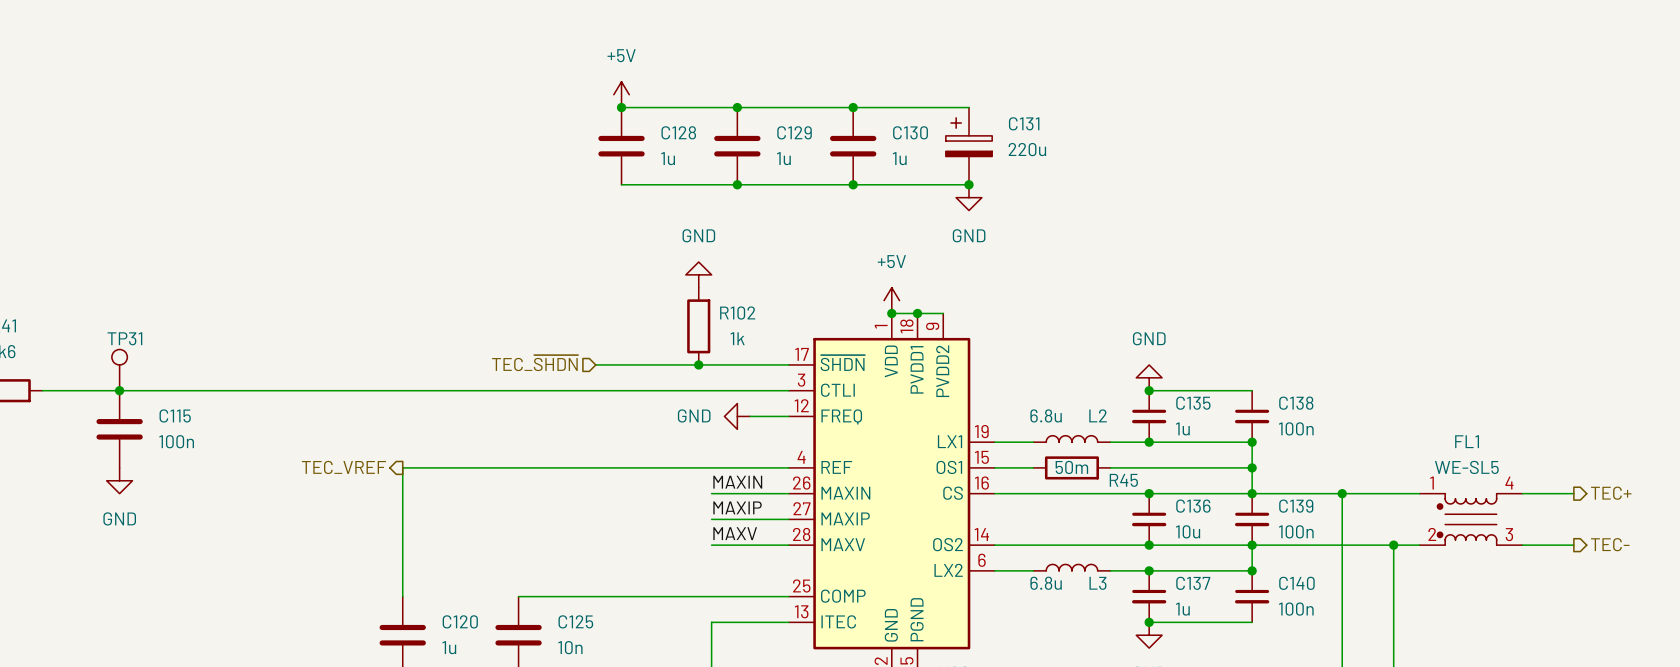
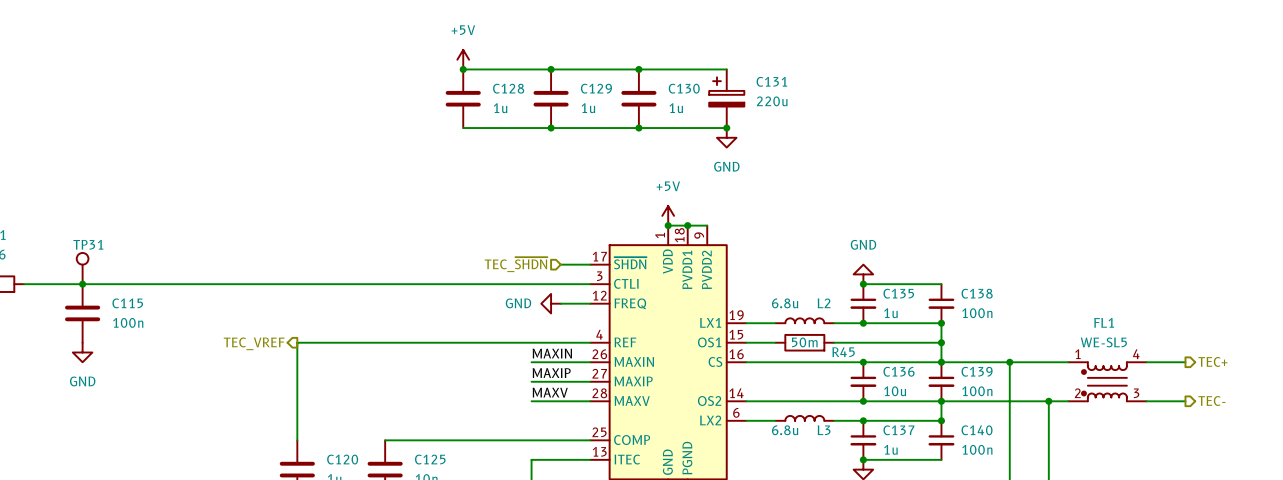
power symbol: GND (698, 274) -> none
R102: 1k (698, 326) -> none
hierarchical label position: TEC_~{SHDN} (535, 363) -> TEC_~{SHDN} (516, 264)
wire: (595, 364) (750, 364) -> none
junction: (698, 364) -> none

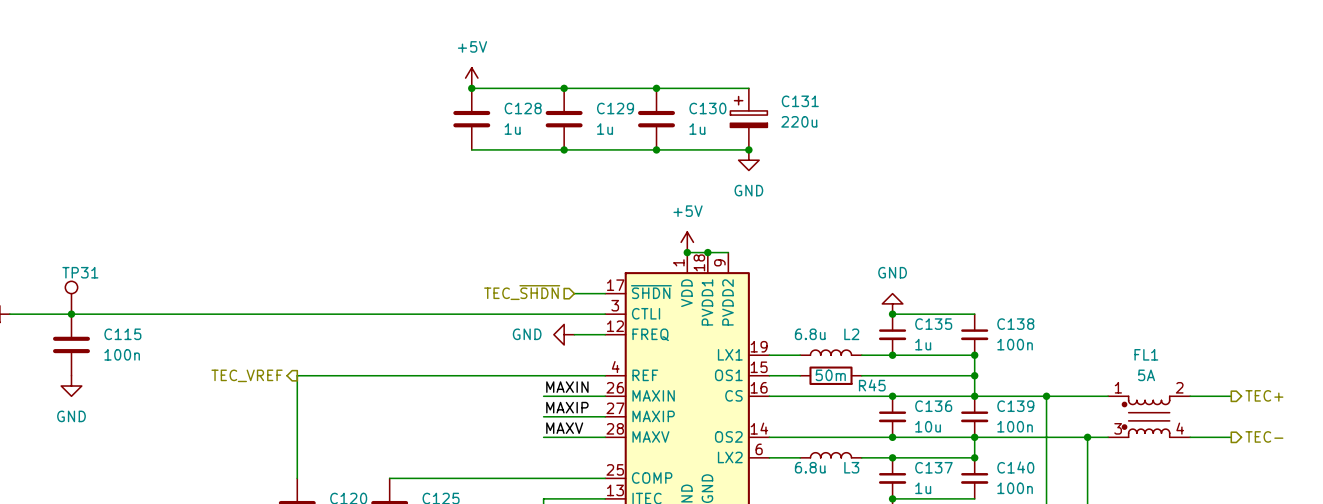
FL1 value: WE-SL5 (1103, 342) -> 5A (1146, 375)
FL1 symbol: [1068, 362, 1147, 402] -> [1108, 396, 1191, 438]

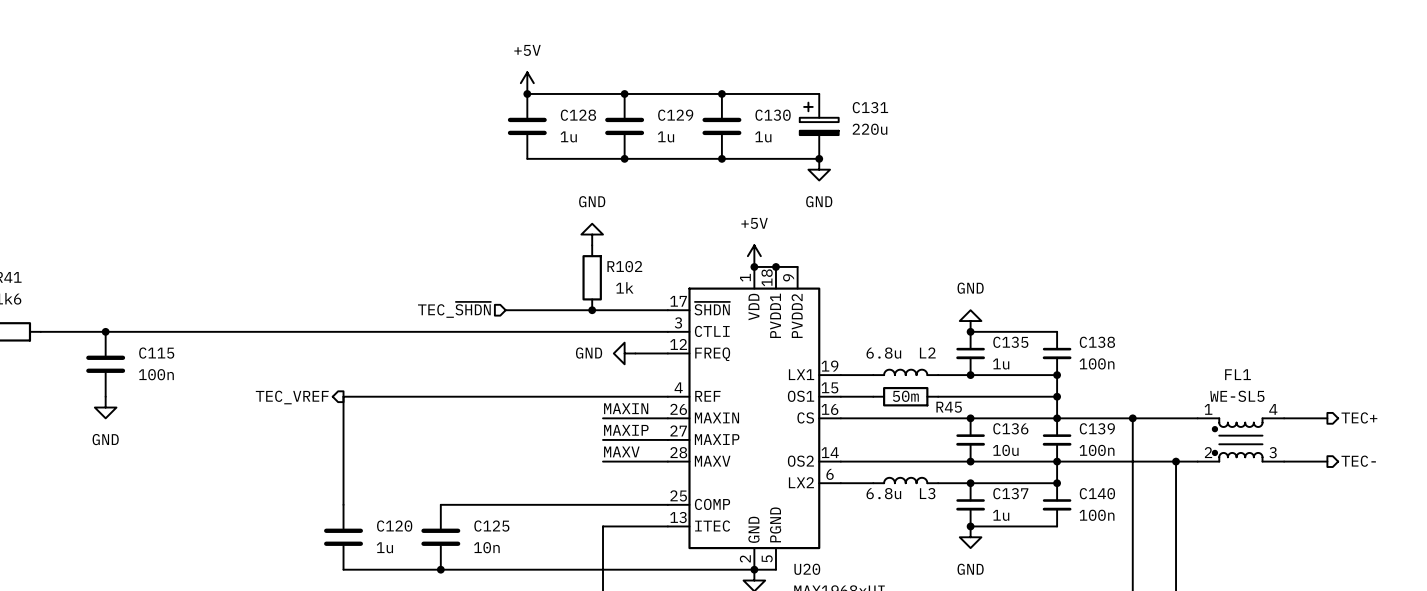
power symbol: none -> GND (592, 234)
R102: none -> 1k (592, 277)
hierarchical label position: TEC_~{SHDN} (522, 292) -> TEC_~{SHDN} (454, 309)
wire: none -> (505, 310) (635, 310)
junction: none -> (592, 310)
TP31: (71, 297) -> none
FL1 value: 5A (1146, 375) -> WE-SL5 (1237, 396)
FL1 symbol: [1108, 396, 1191, 438] -> [1197, 418, 1285, 462]

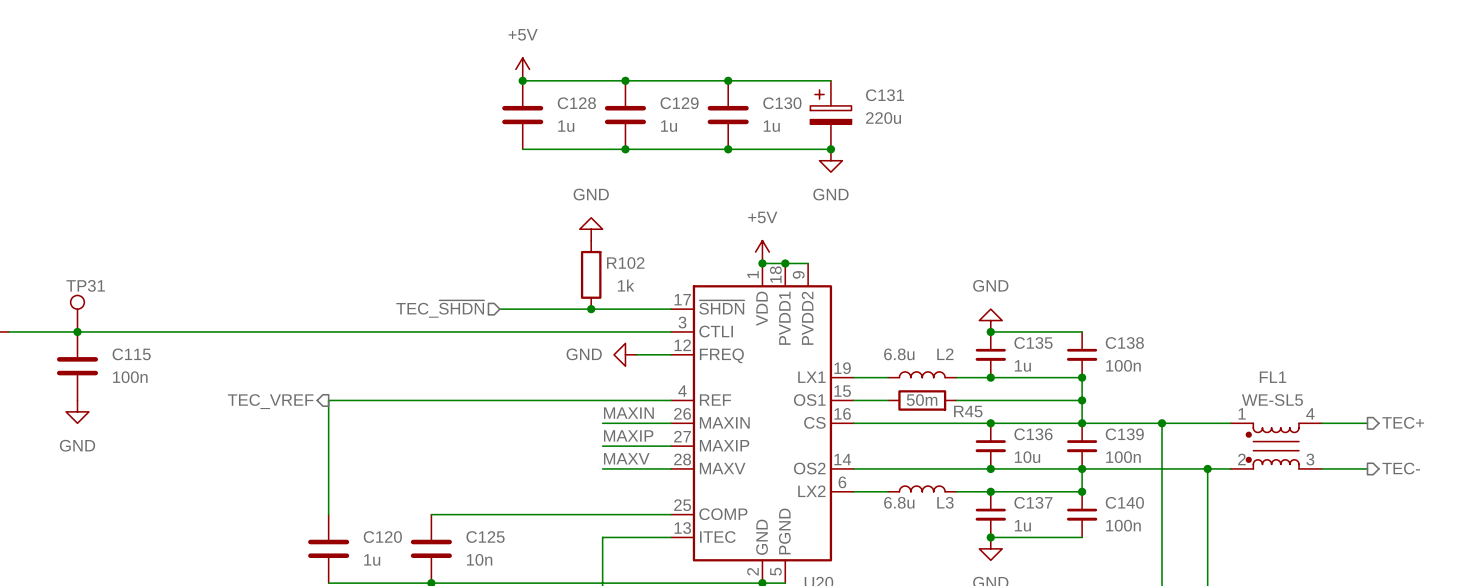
TP31: none -> (77, 313)

